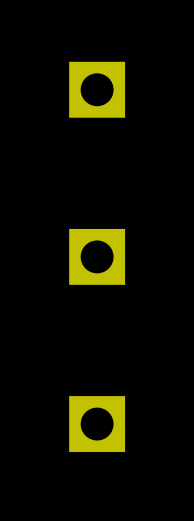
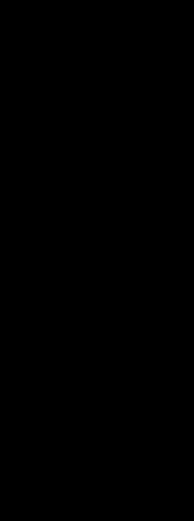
part: (97, 89) -> none
part: (97, 256) -> none
part: (97, 424) -> none

